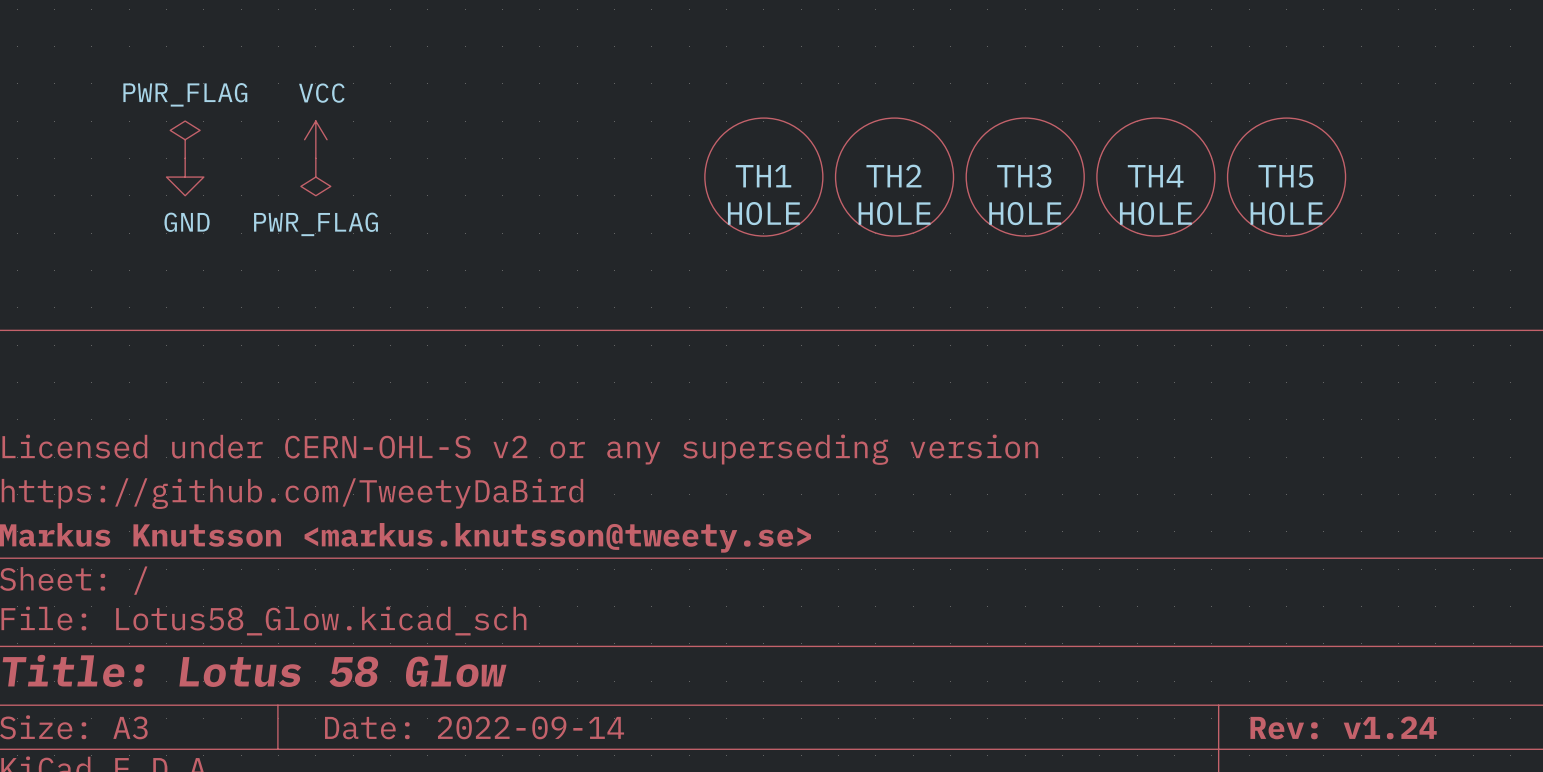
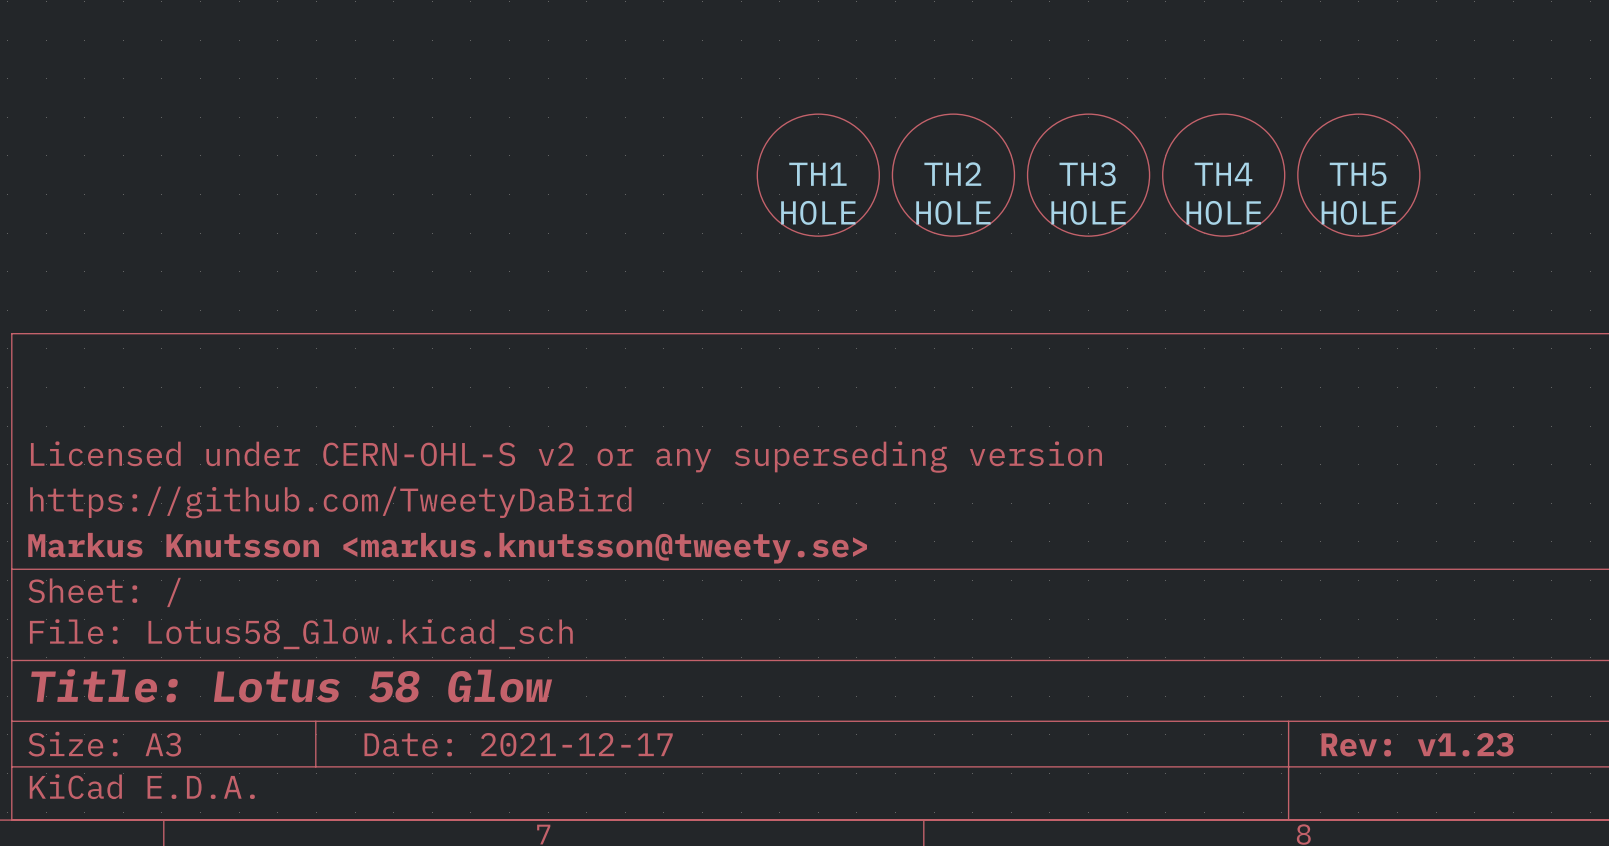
power symbol: PWR_FLAG (185, 139) -> none
power symbol: VCC (315, 139) -> none
power symbol: GND (185, 177) -> none
power symbol: PWR_FLAG (315, 177) -> none
title block: Date: 2022-09-14 (474, 727) -> Date: 2021-12-17 (518, 744)
title block: Rev: v1.24 (1343, 727) -> Rev: v1.23 (1417, 744)

